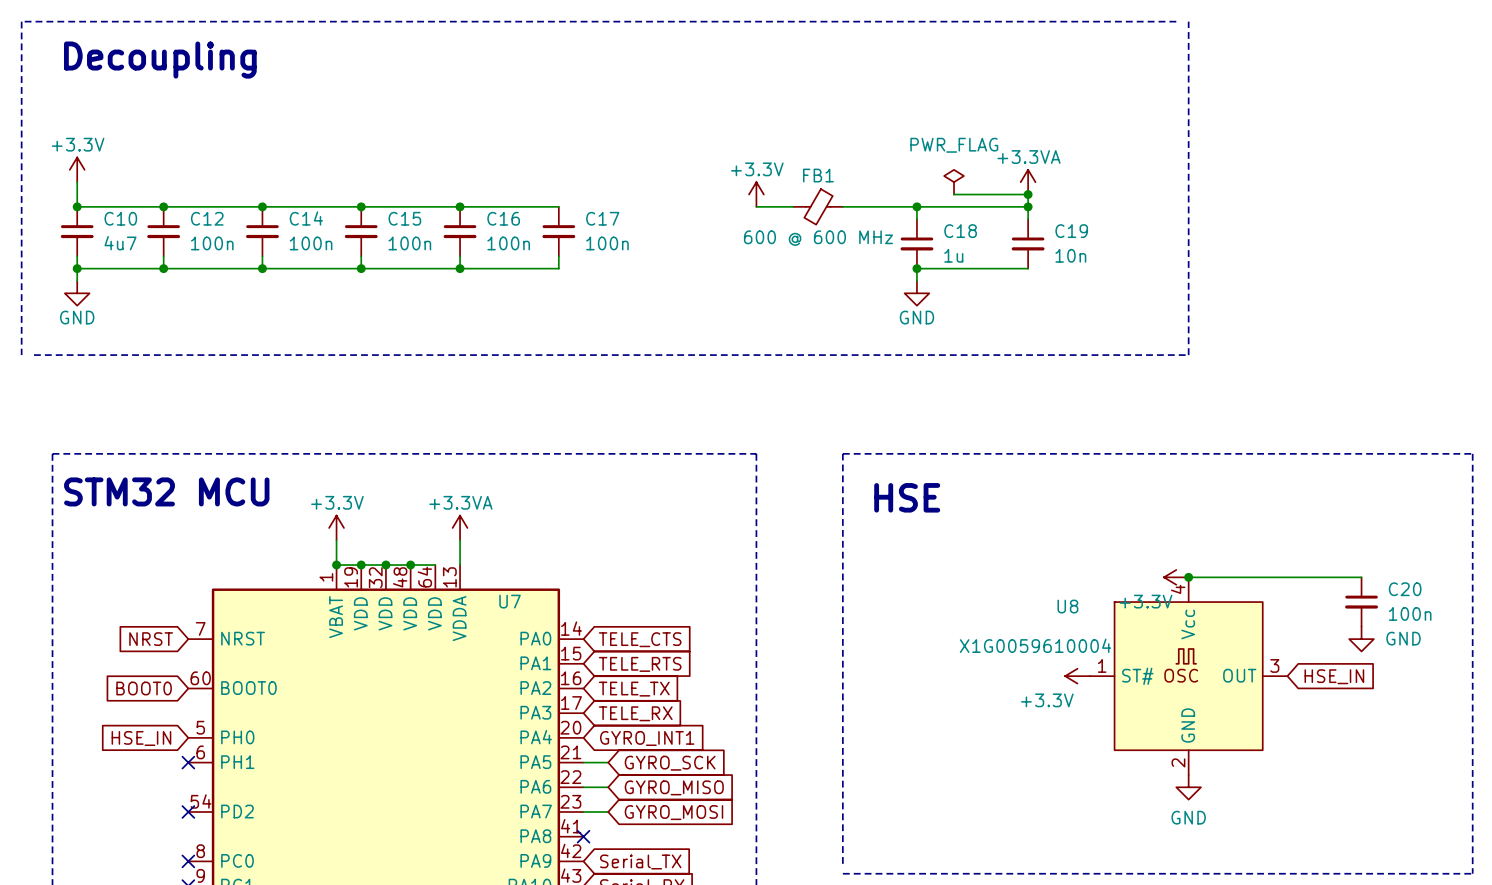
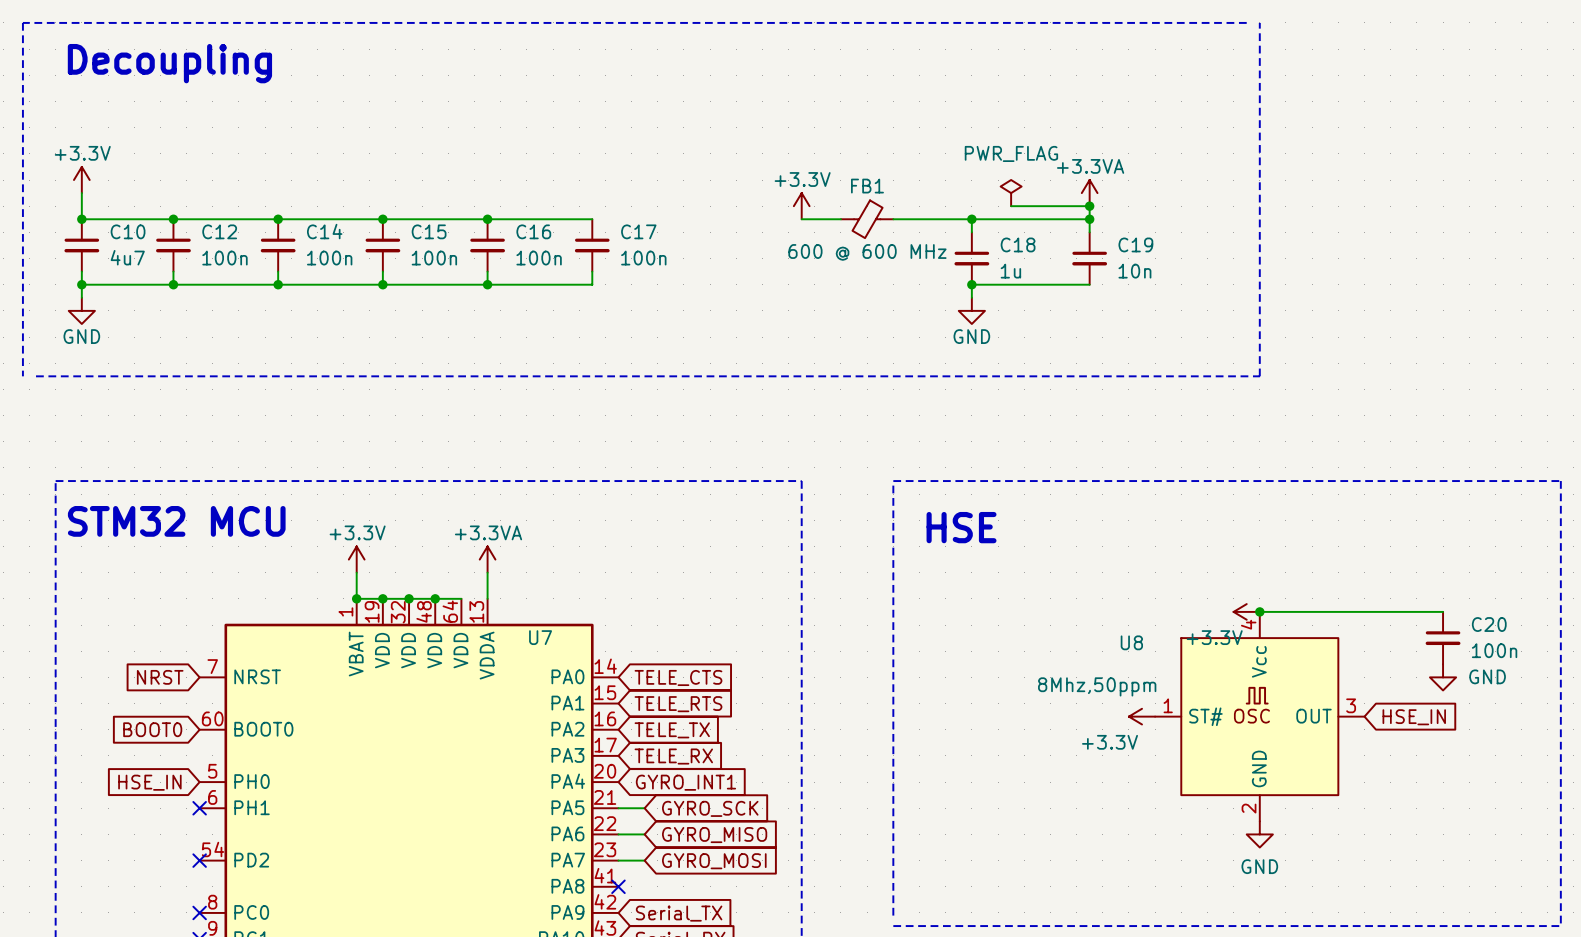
U8 value: X1G0059610004 (1035, 645) -> 8Mhz,50ppm (1097, 686)

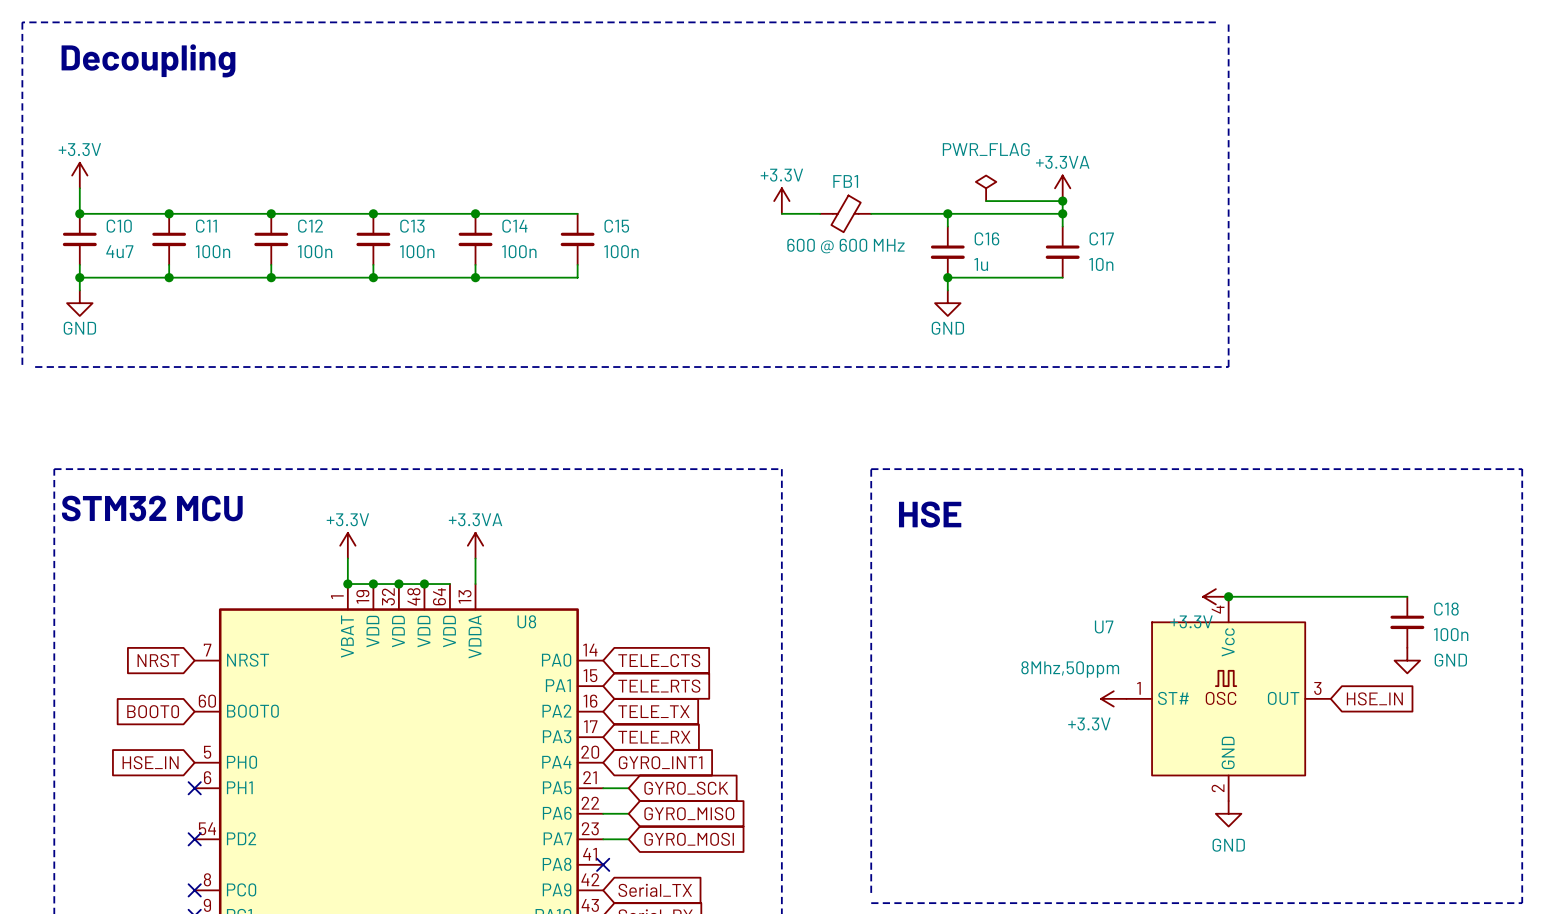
C12 name: C12 (219, 231) -> C11 (206, 226)
C14 name: C14 (324, 231) -> C12 (310, 226)
C15 name: C15 (429, 231) -> C13 (412, 226)
C16 name: C16 (533, 231) -> C14 (514, 226)
C17 name: C17 (638, 231) -> C15 (616, 226)
C18 name: C18 (1018, 244) -> C16 (986, 238)
C19 name: C19 (1135, 244) -> C17 (1101, 238)
C20 name: C20 (1489, 624) -> C18 (1446, 609)
U7 name: U7 (540, 637) -> U8 (526, 621)
U8 name: U8 (1131, 642) -> U7 (1104, 627)

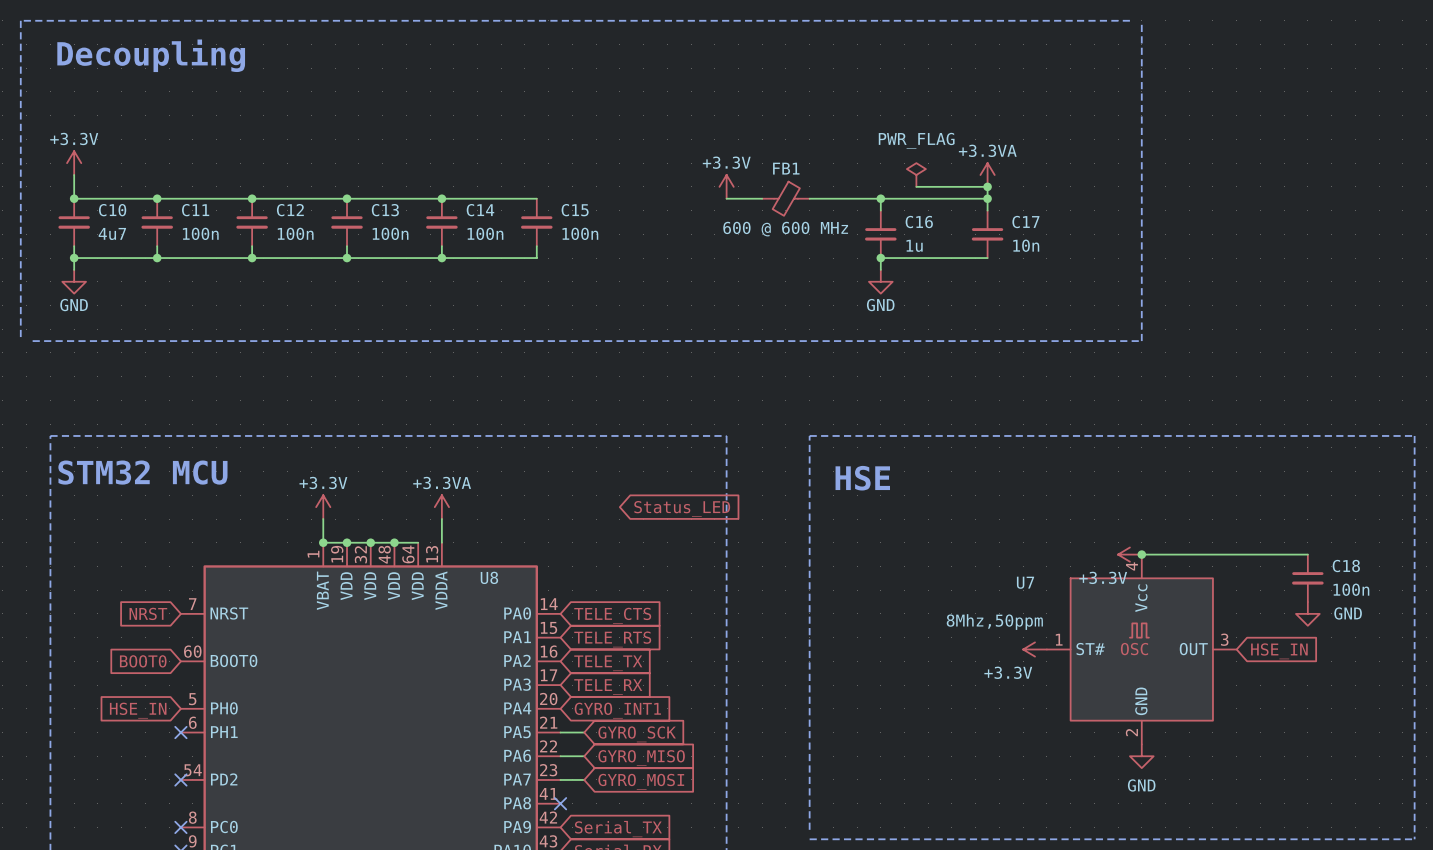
global label: none -> Status_LED (682, 508)

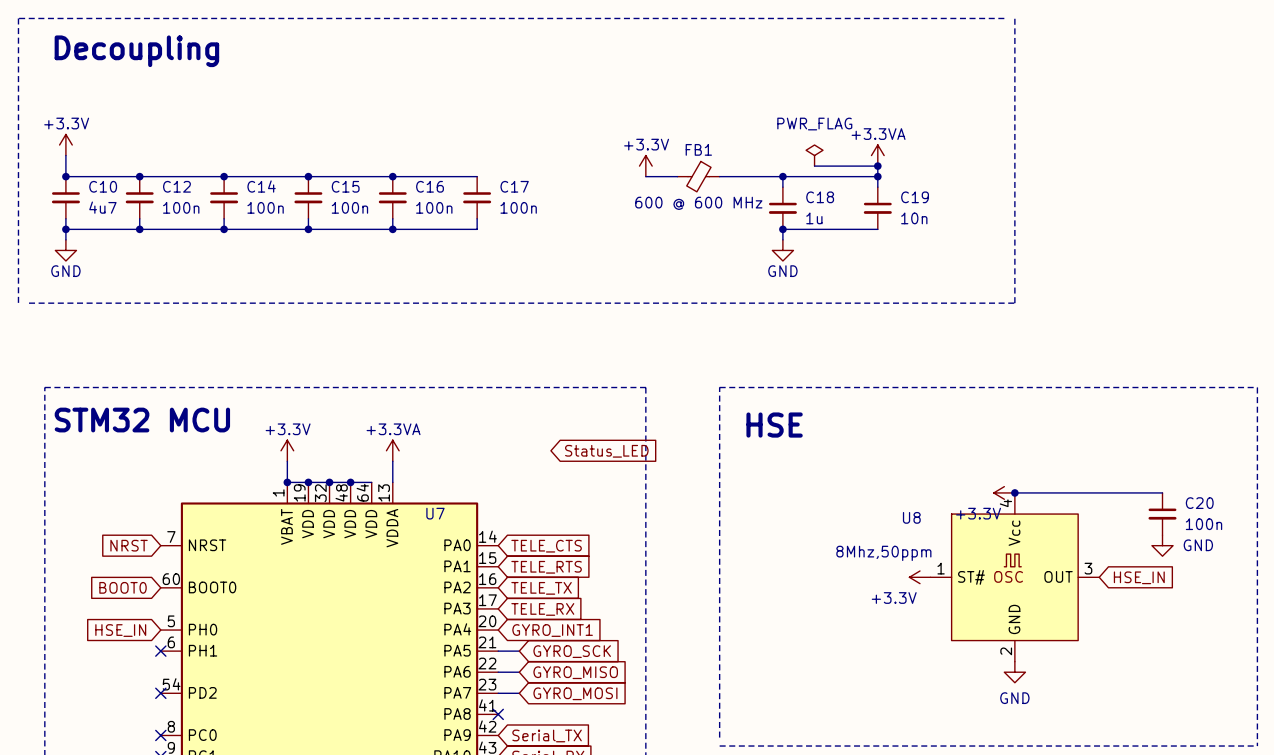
C11 name: C11 (195, 210) -> C12 (176, 186)
C12 name: C12 (290, 210) -> C14 (261, 186)
C13 name: C13 (385, 210) -> C15 (345, 186)
C14 name: C14 (480, 210) -> C16 (430, 186)
C15 name: C15 (575, 210) -> C17 (514, 186)
C16 name: C16 (919, 222) -> C18 (820, 197)
C17 name: C17 (1025, 222) -> C19 (915, 197)
C18 name: C18 (1346, 566) -> C20 (1199, 503)
U8 name: U8 (489, 577) -> U7 (435, 513)
U7 name: U7 (1025, 582) -> U8 (911, 517)

